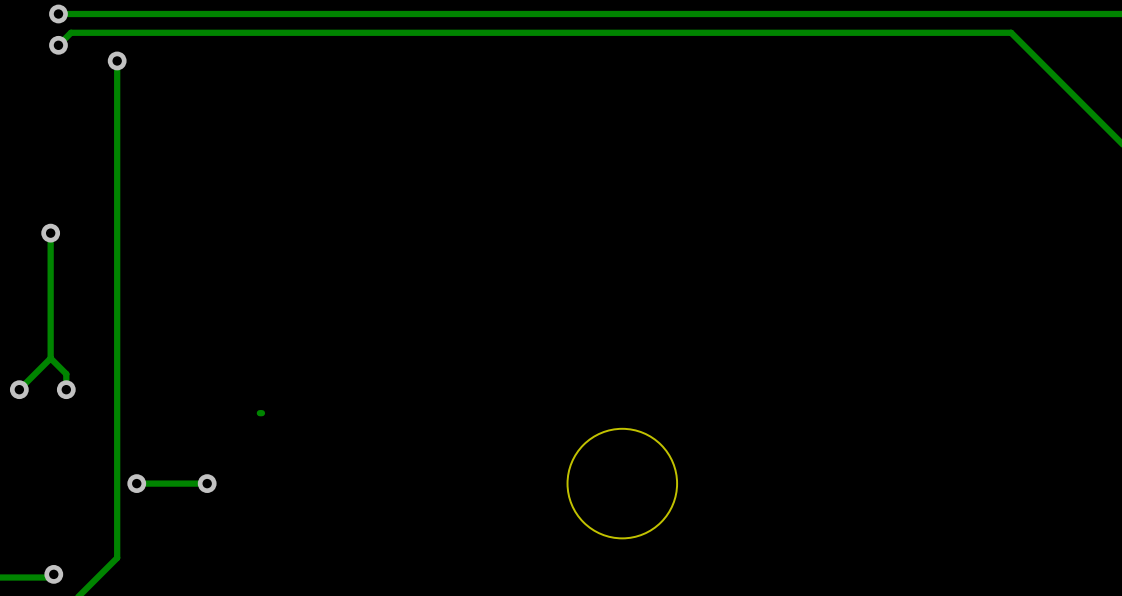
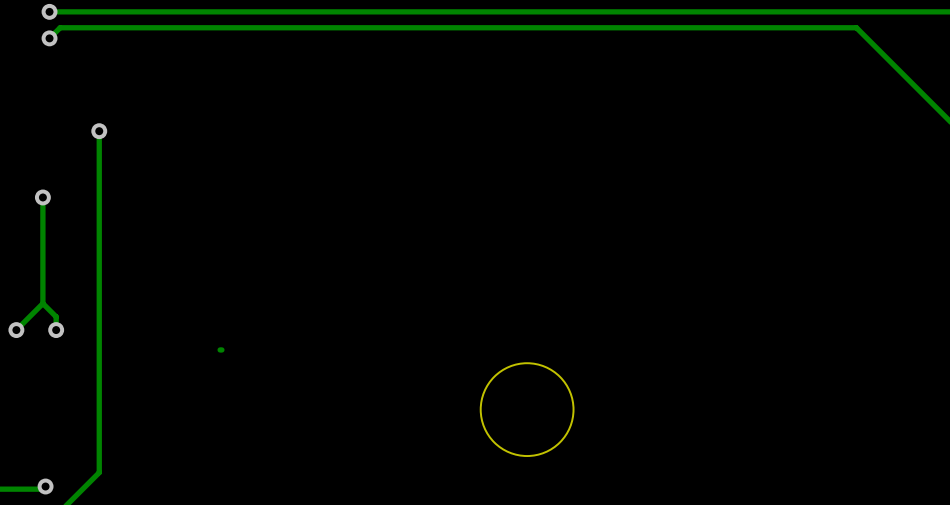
track: (117, 60) (117, 154) -> none
via position: (117, 60) -> (99, 131)
via: (136, 483) -> none
track: (207, 483) (136, 483) -> none
via: (207, 483) -> none

